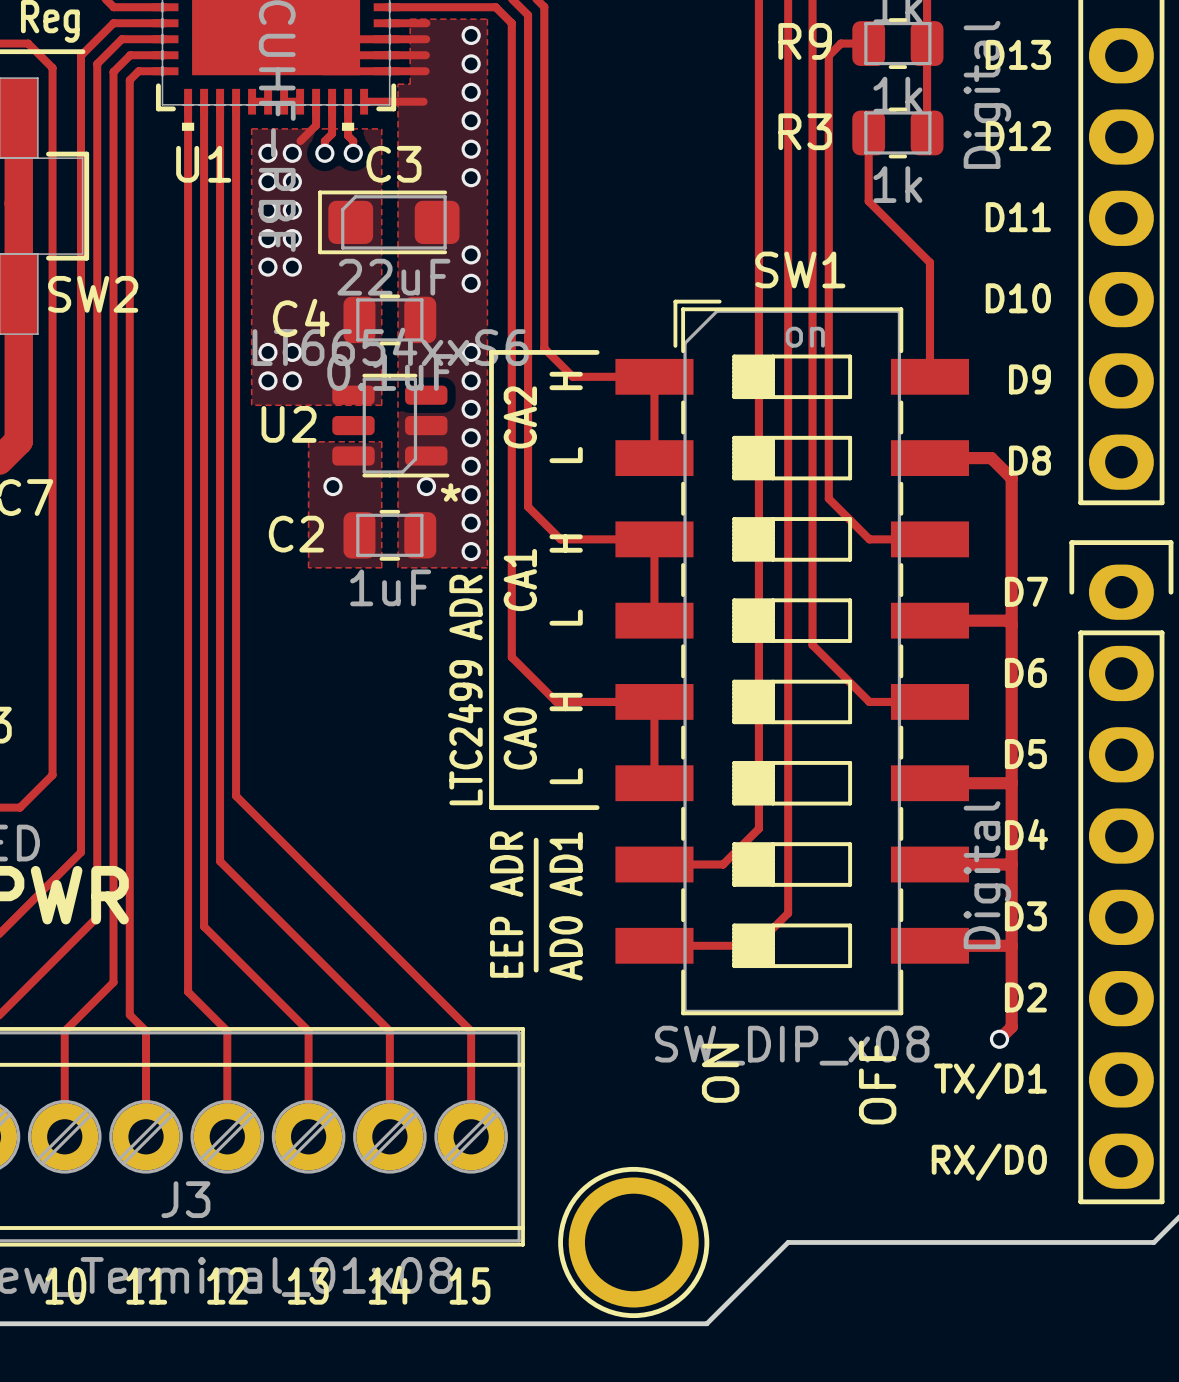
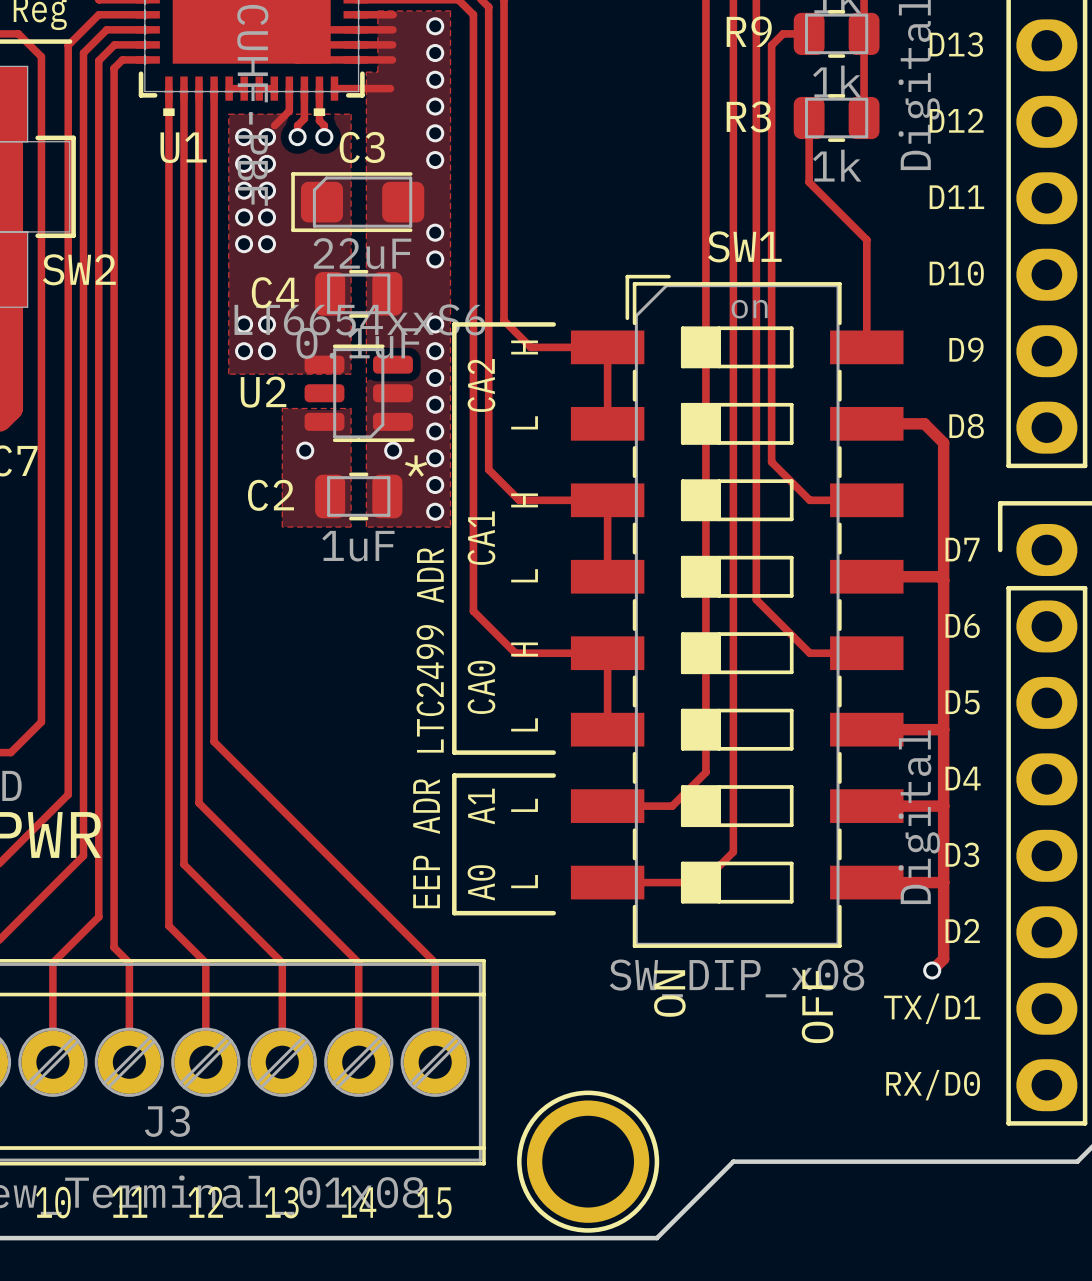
line: none -> (553, 775) (454, 775) (454, 913) (553, 913)
line: (536, 840) (536, 970) -> none
text: none -> EEP ADR (426, 843)
text: EEP ADR (506, 904) -> A0 A1 (481, 844)
text: AD0 AD1 (566, 906) -> L L (524, 843)

